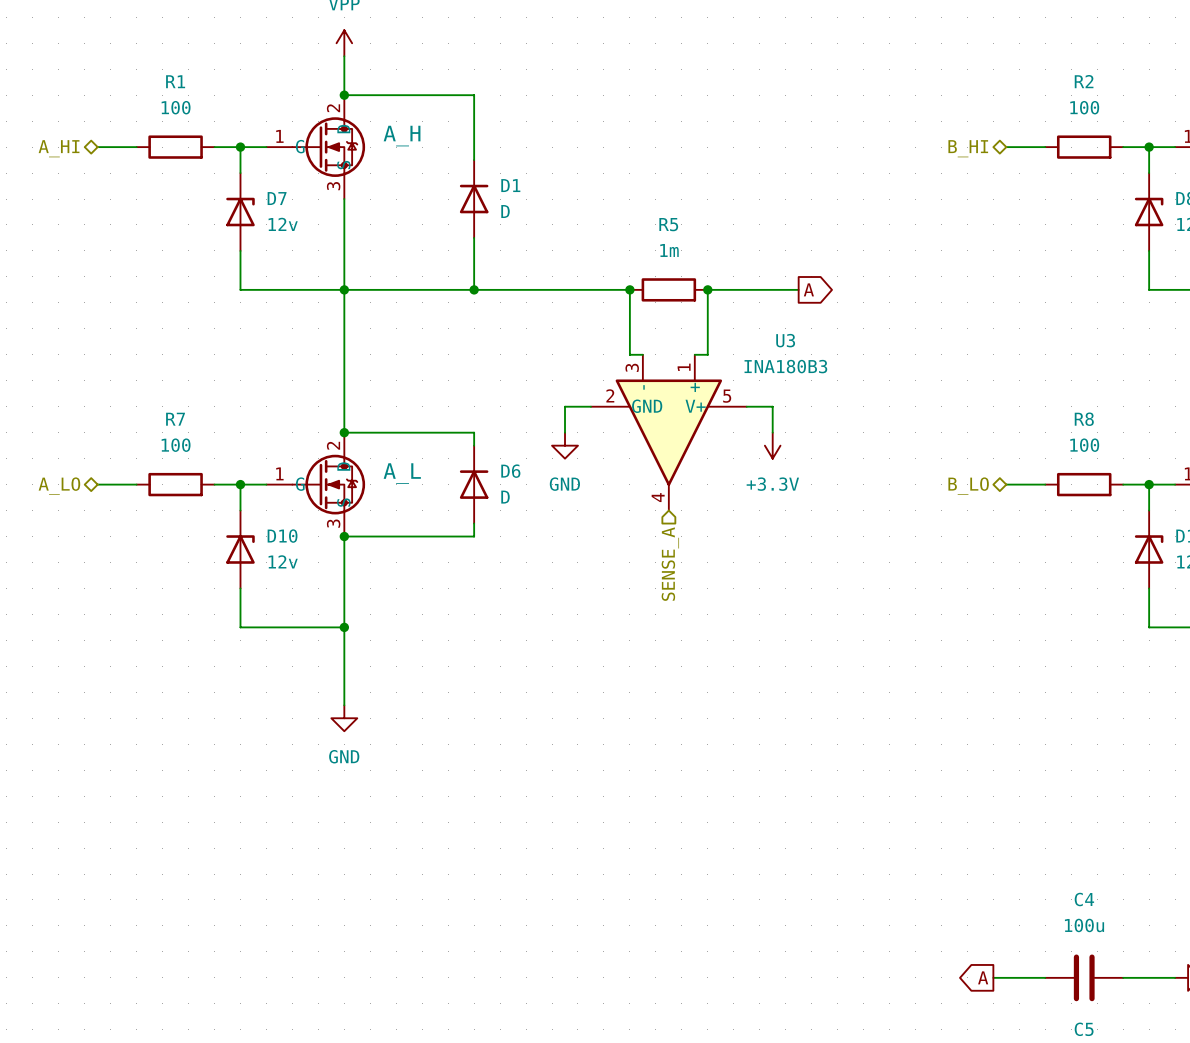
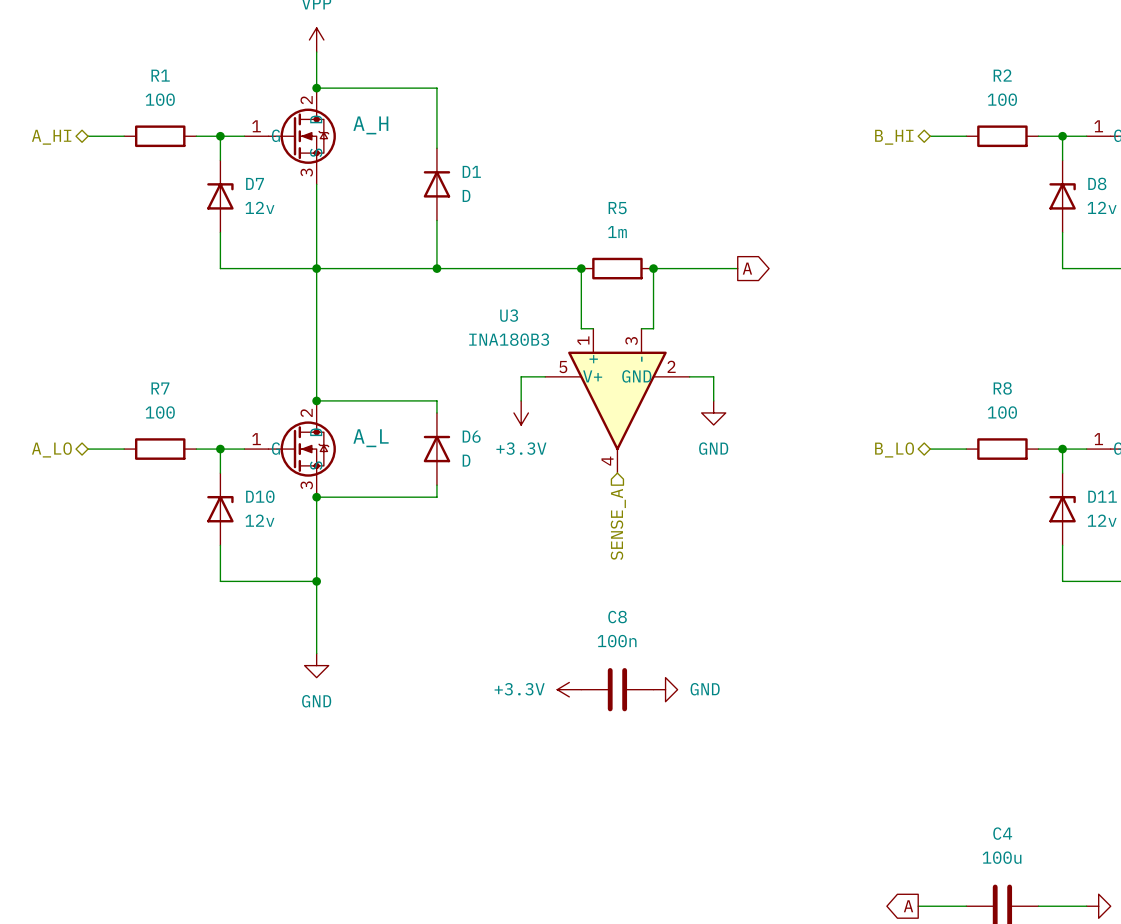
U3 flip: as is (668, 432) -> left-right (617, 400)
power symbol: GND (565, 445) -> +3.3V (521, 412)
power symbol: +3.3V (772, 445) -> GND (713, 412)
power symbol: none -> +3.3V (569, 689)
C8: none -> 100n (617, 689)
power symbol: none -> GND (665, 689)

